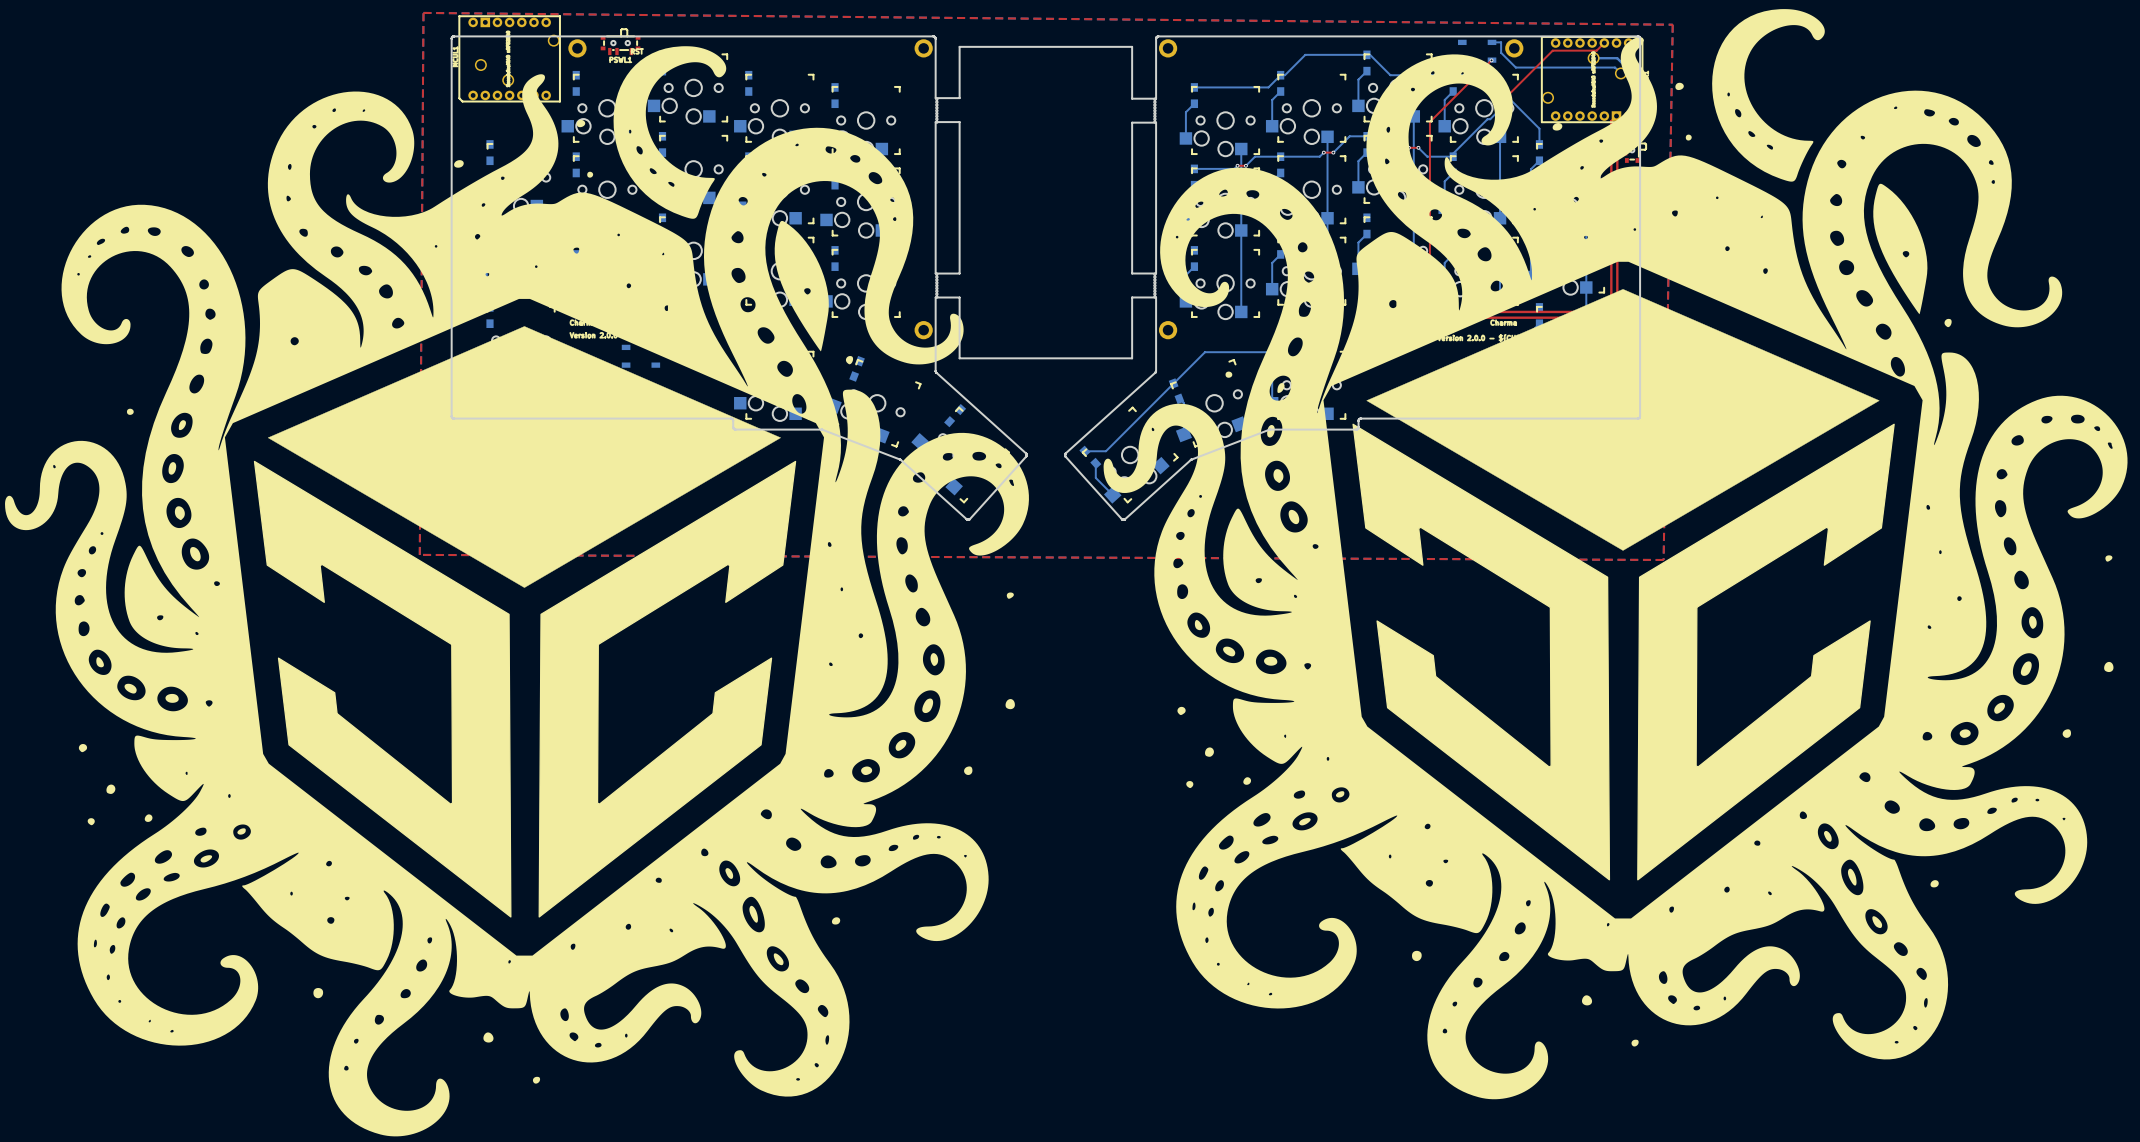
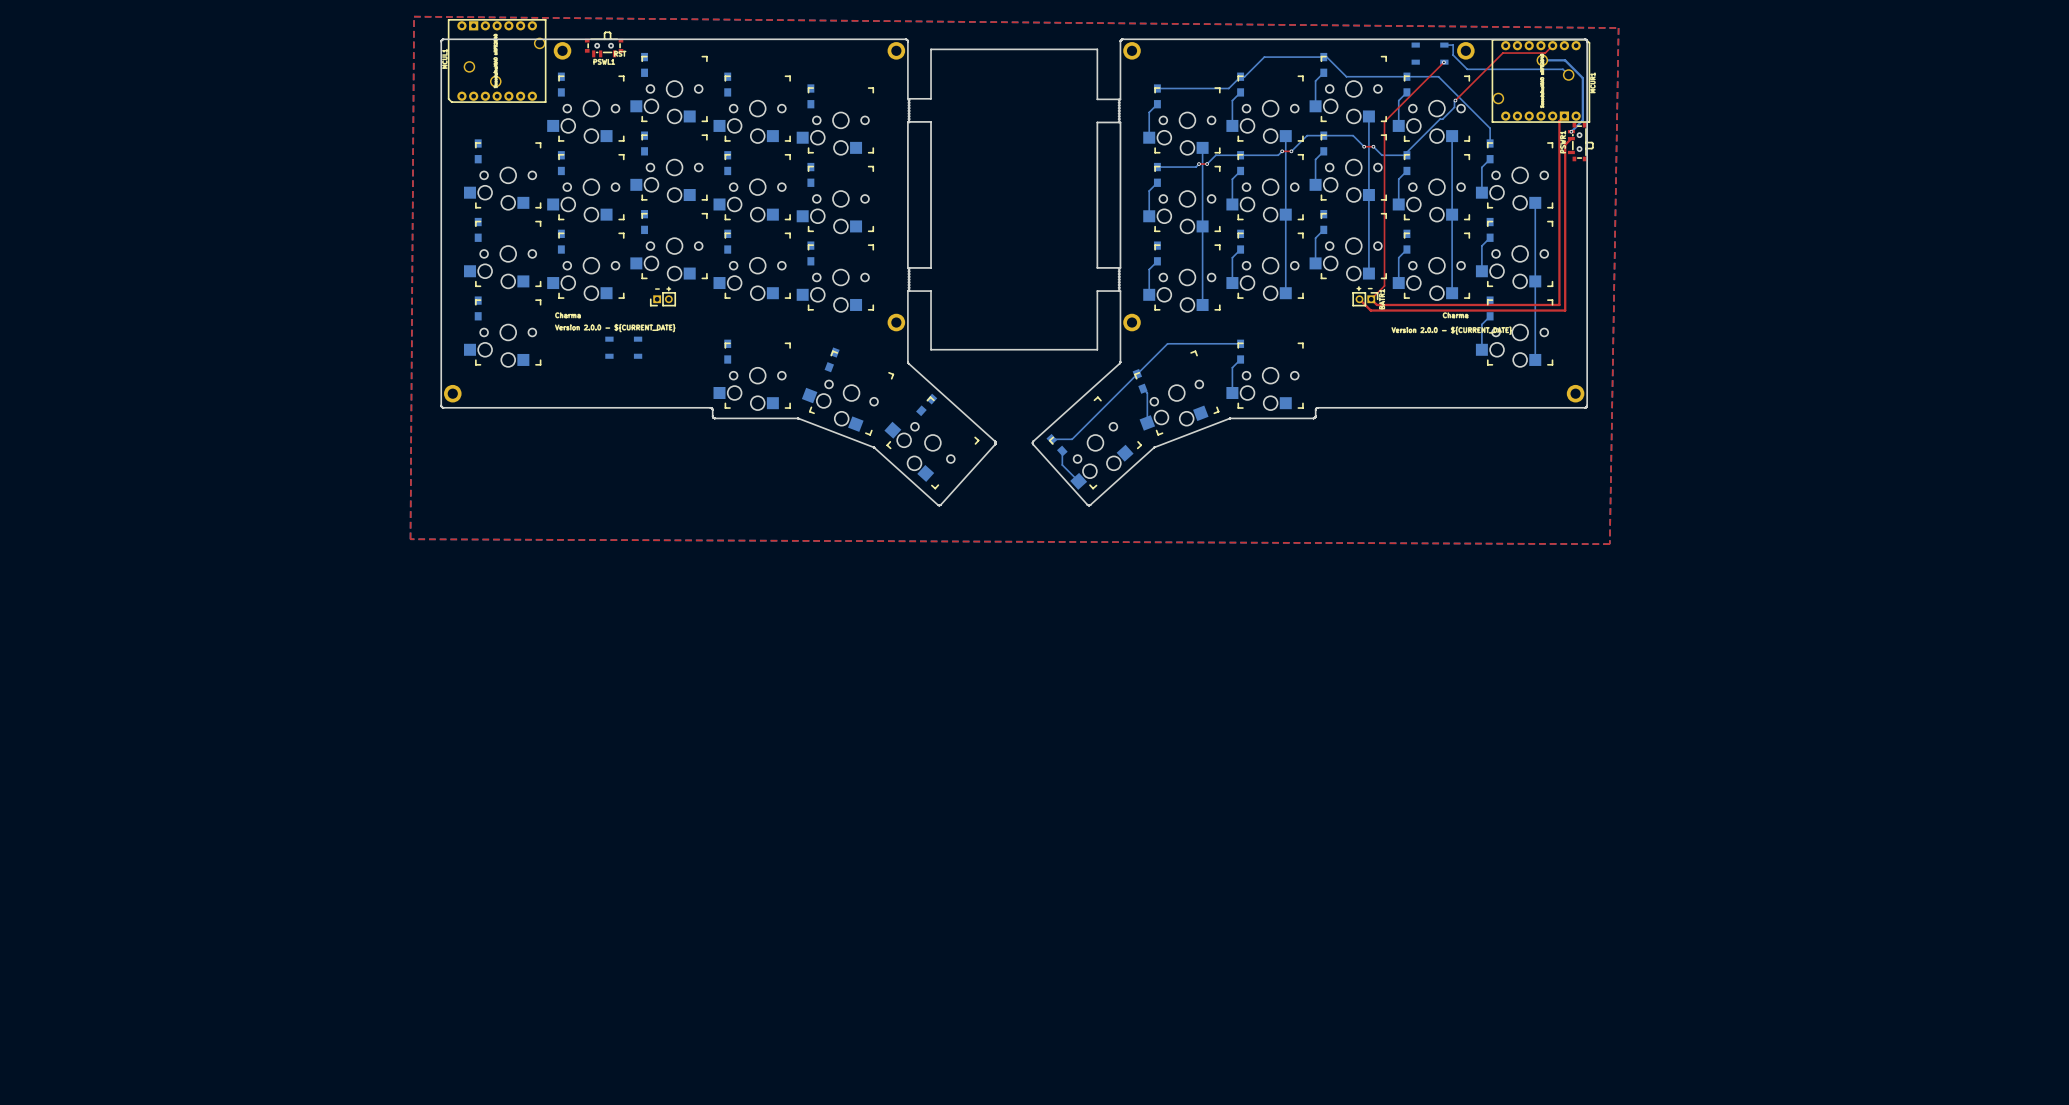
drawing: [1103, 9, 2128, 1100] -> none
drawing: [5, 46, 1029, 1137] -> none

